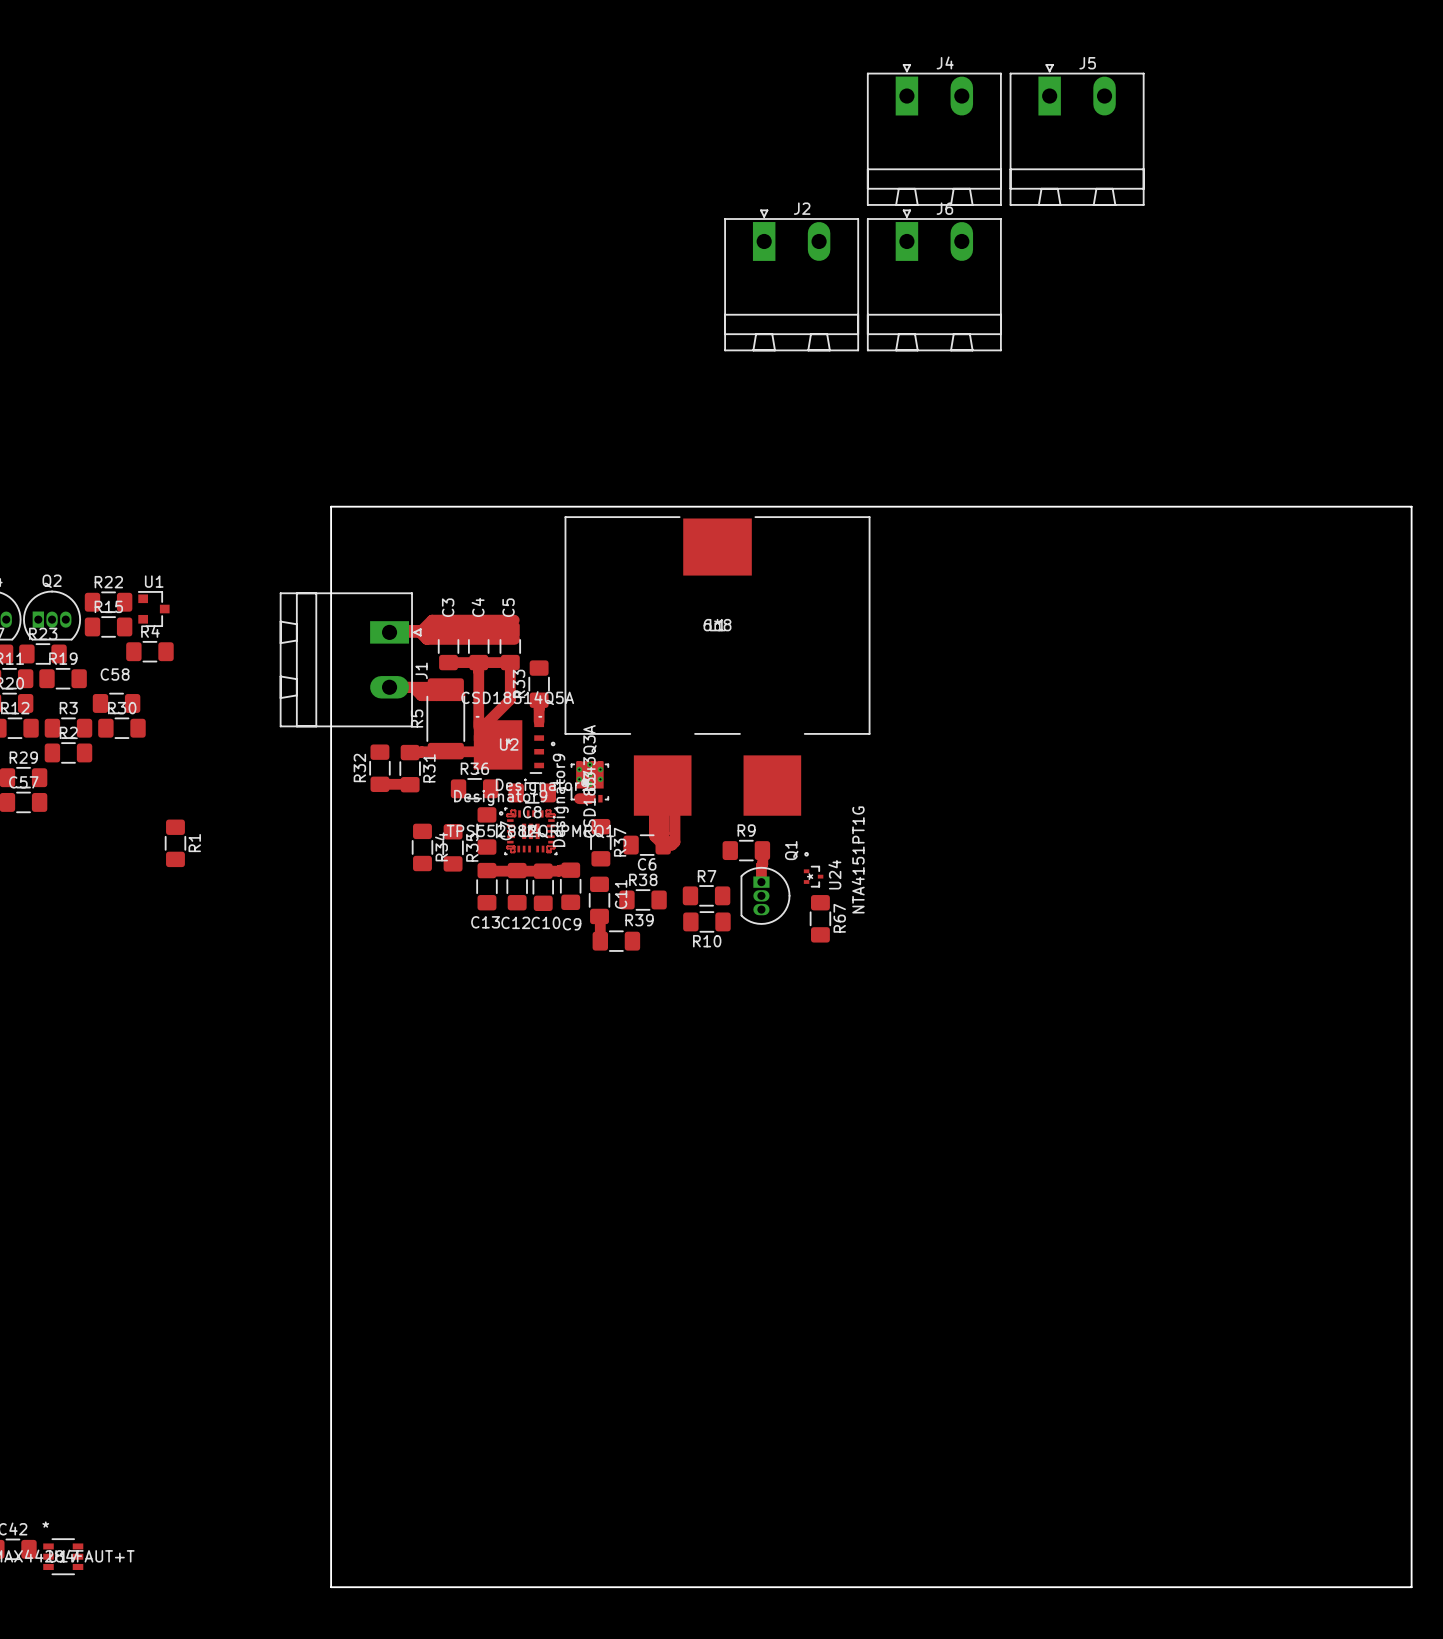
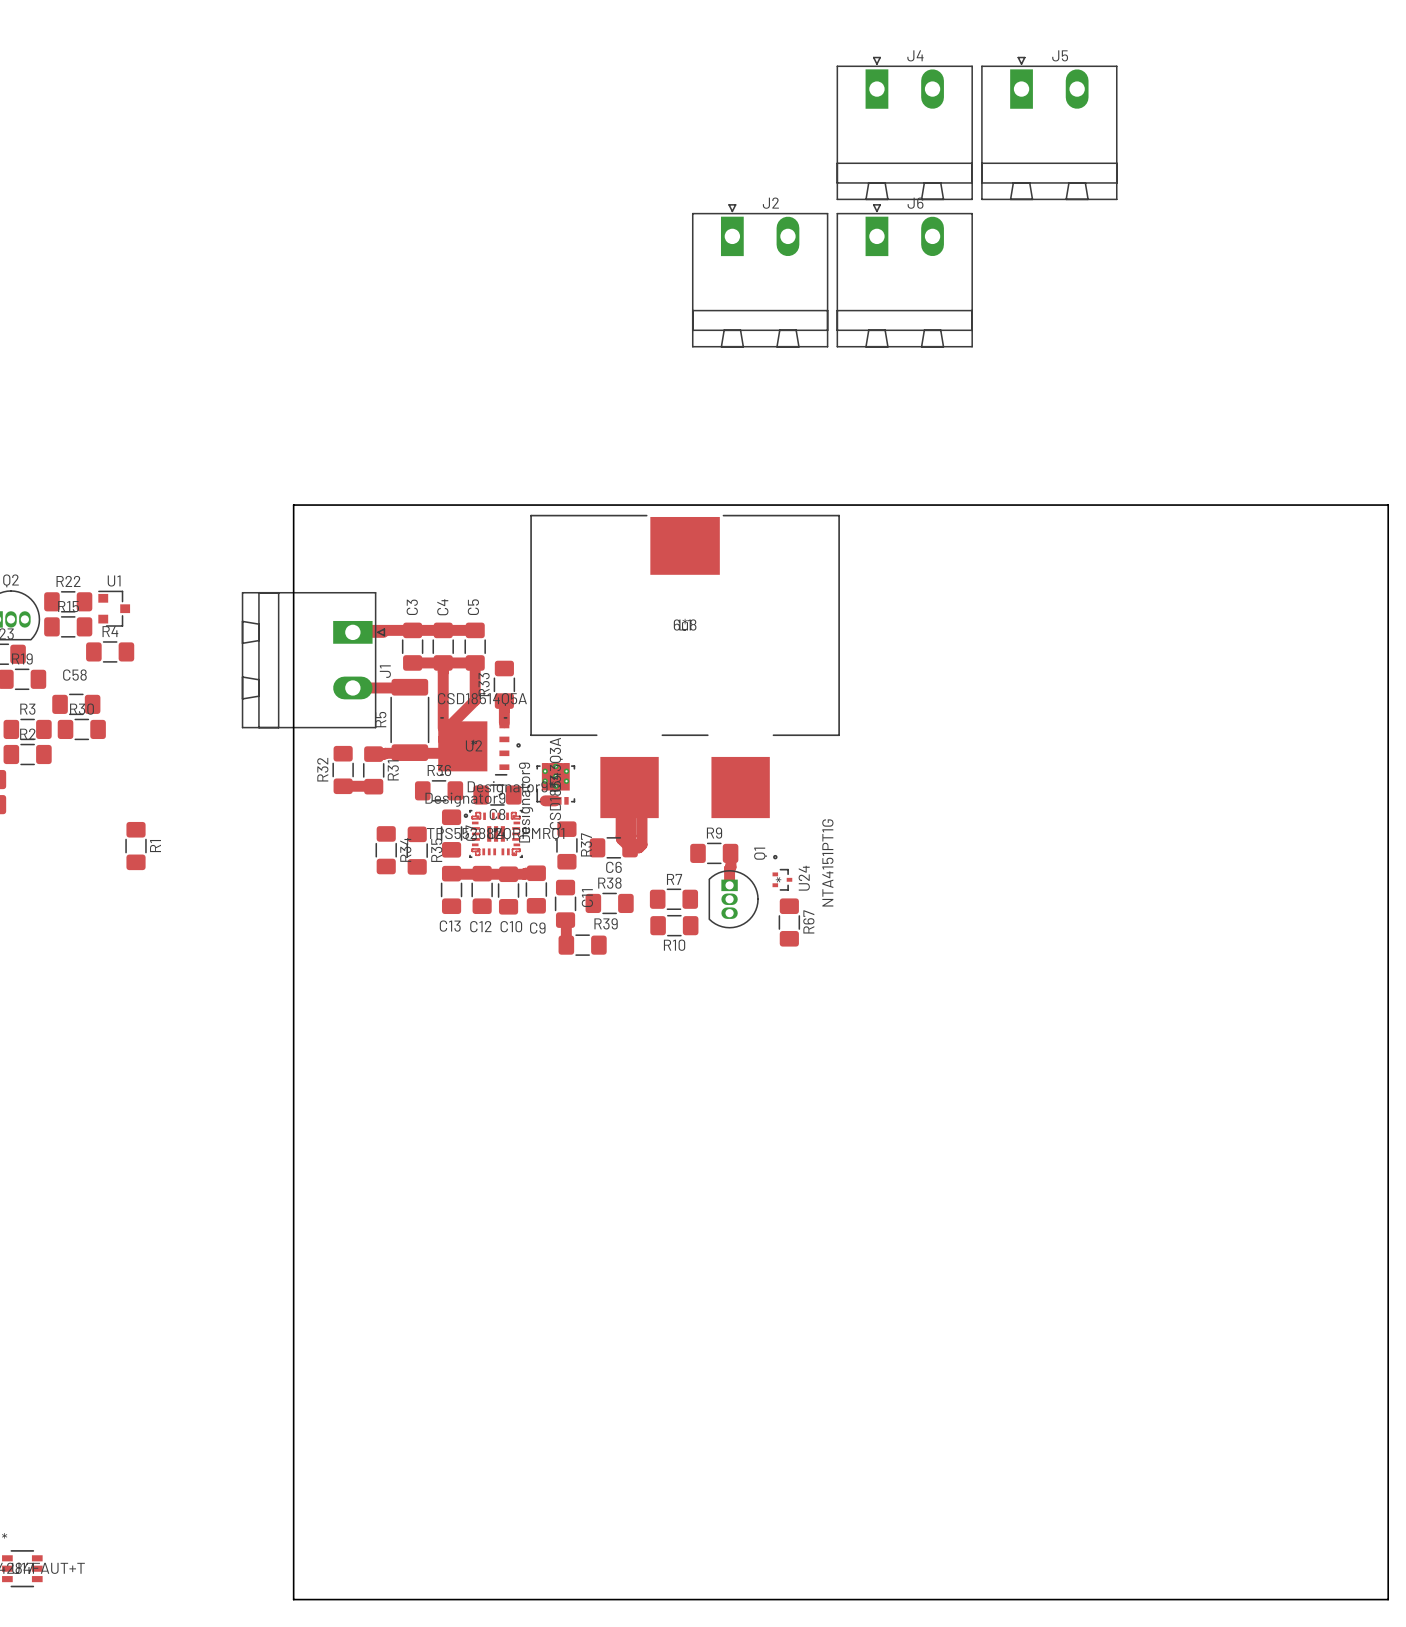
top track: (514, 620) (432, 620) (419, 632) (426, 639) (514, 639) -> none
top track: (412, 687) (421, 695) (460, 695) -> none

